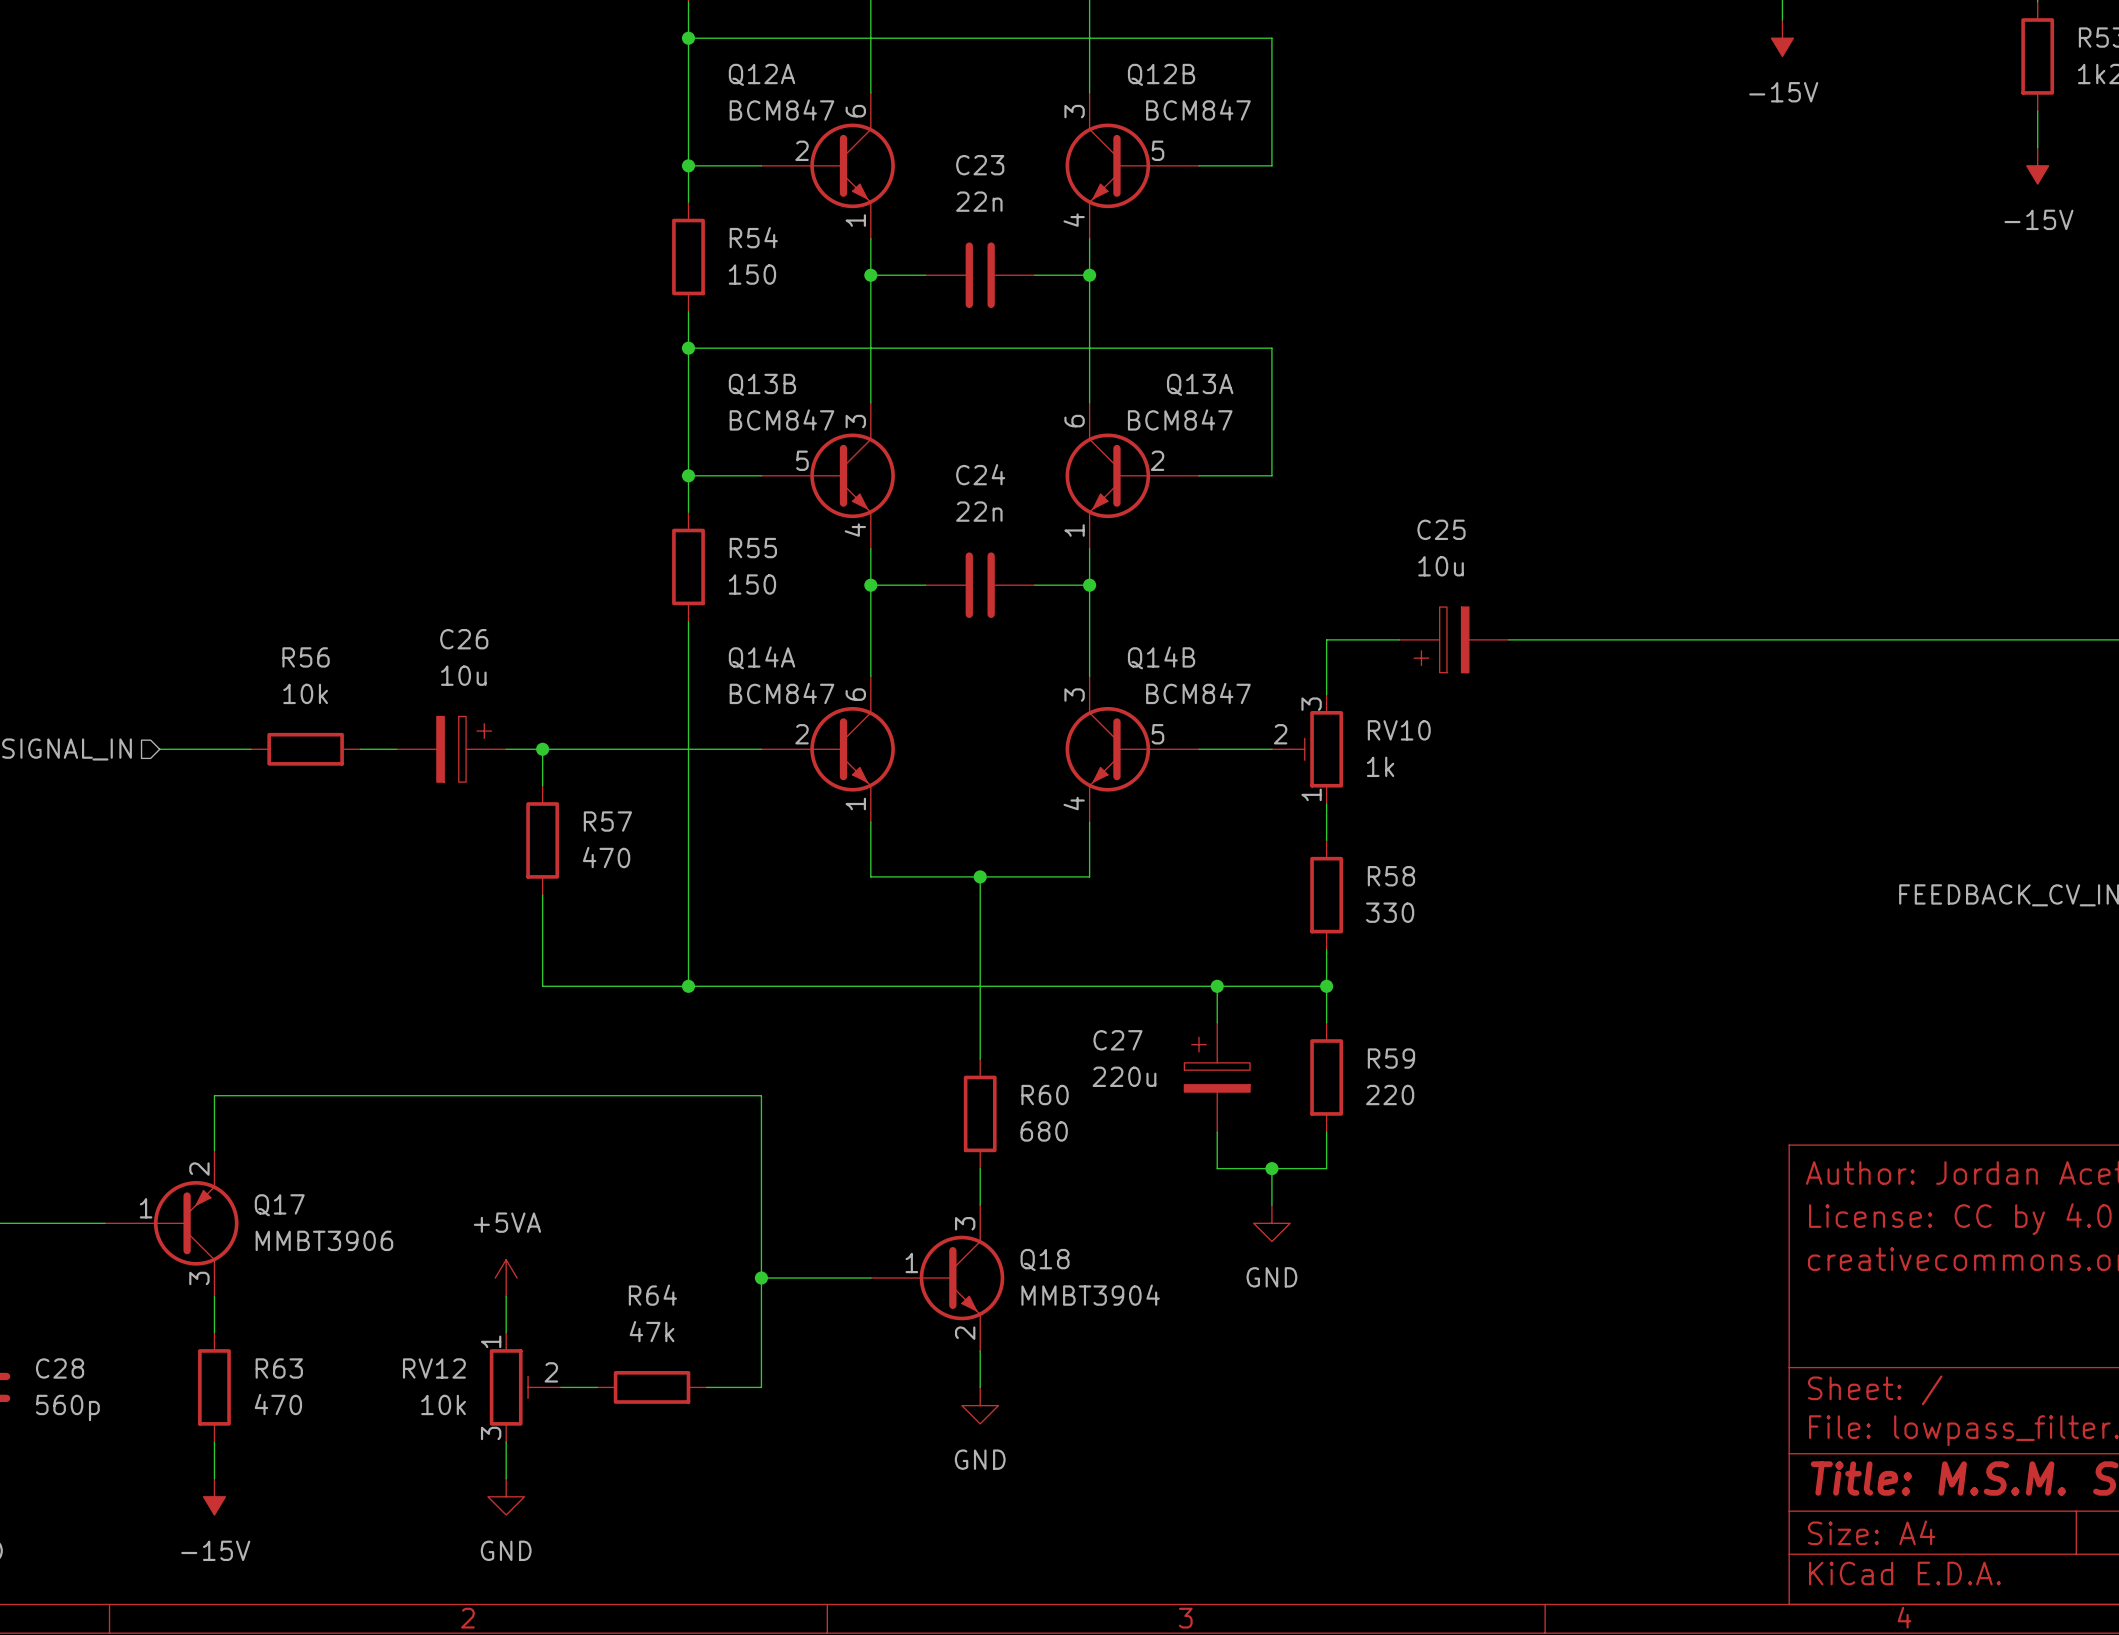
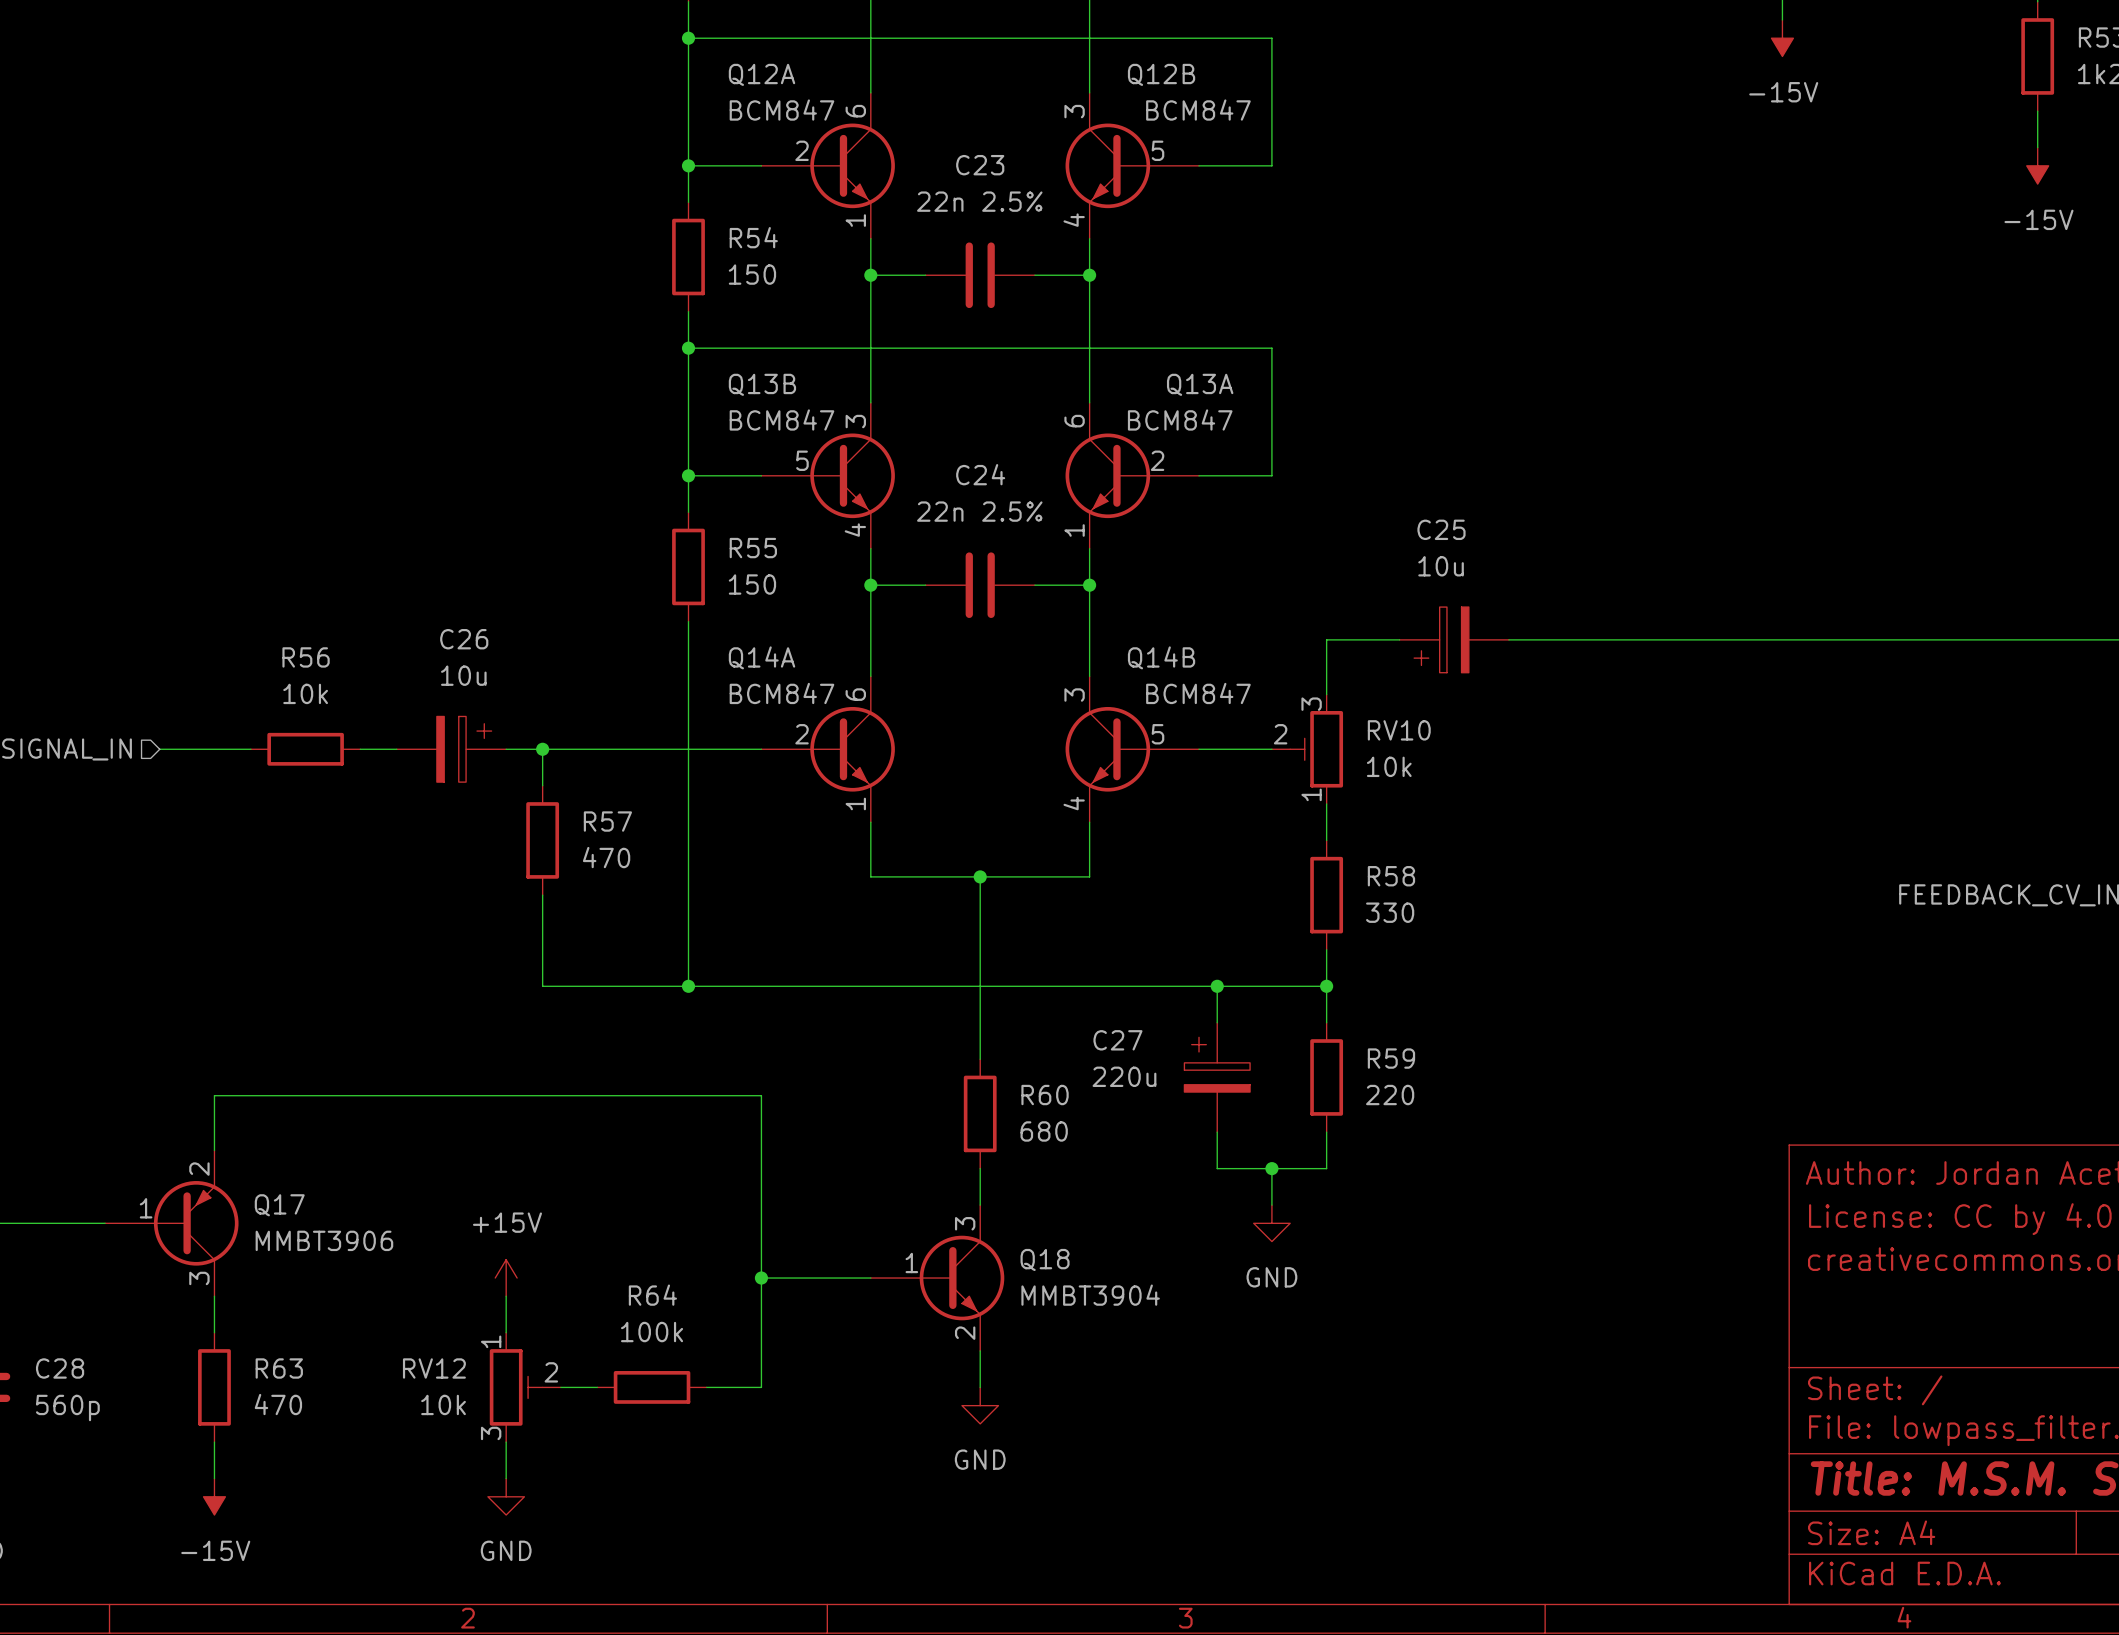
C23 value: 22n (979, 201) -> 22n 2.5% (979, 201)
C24 value: 22n (979, 511) -> 22n 2.5% (979, 511)
RV10 value: 1k (1380, 766) -> 10k (1389, 766)
power symbol: +5VA (506, 1278) -> +15V (506, 1278)
R64 value: 47k (652, 1331) -> 100k (652, 1332)

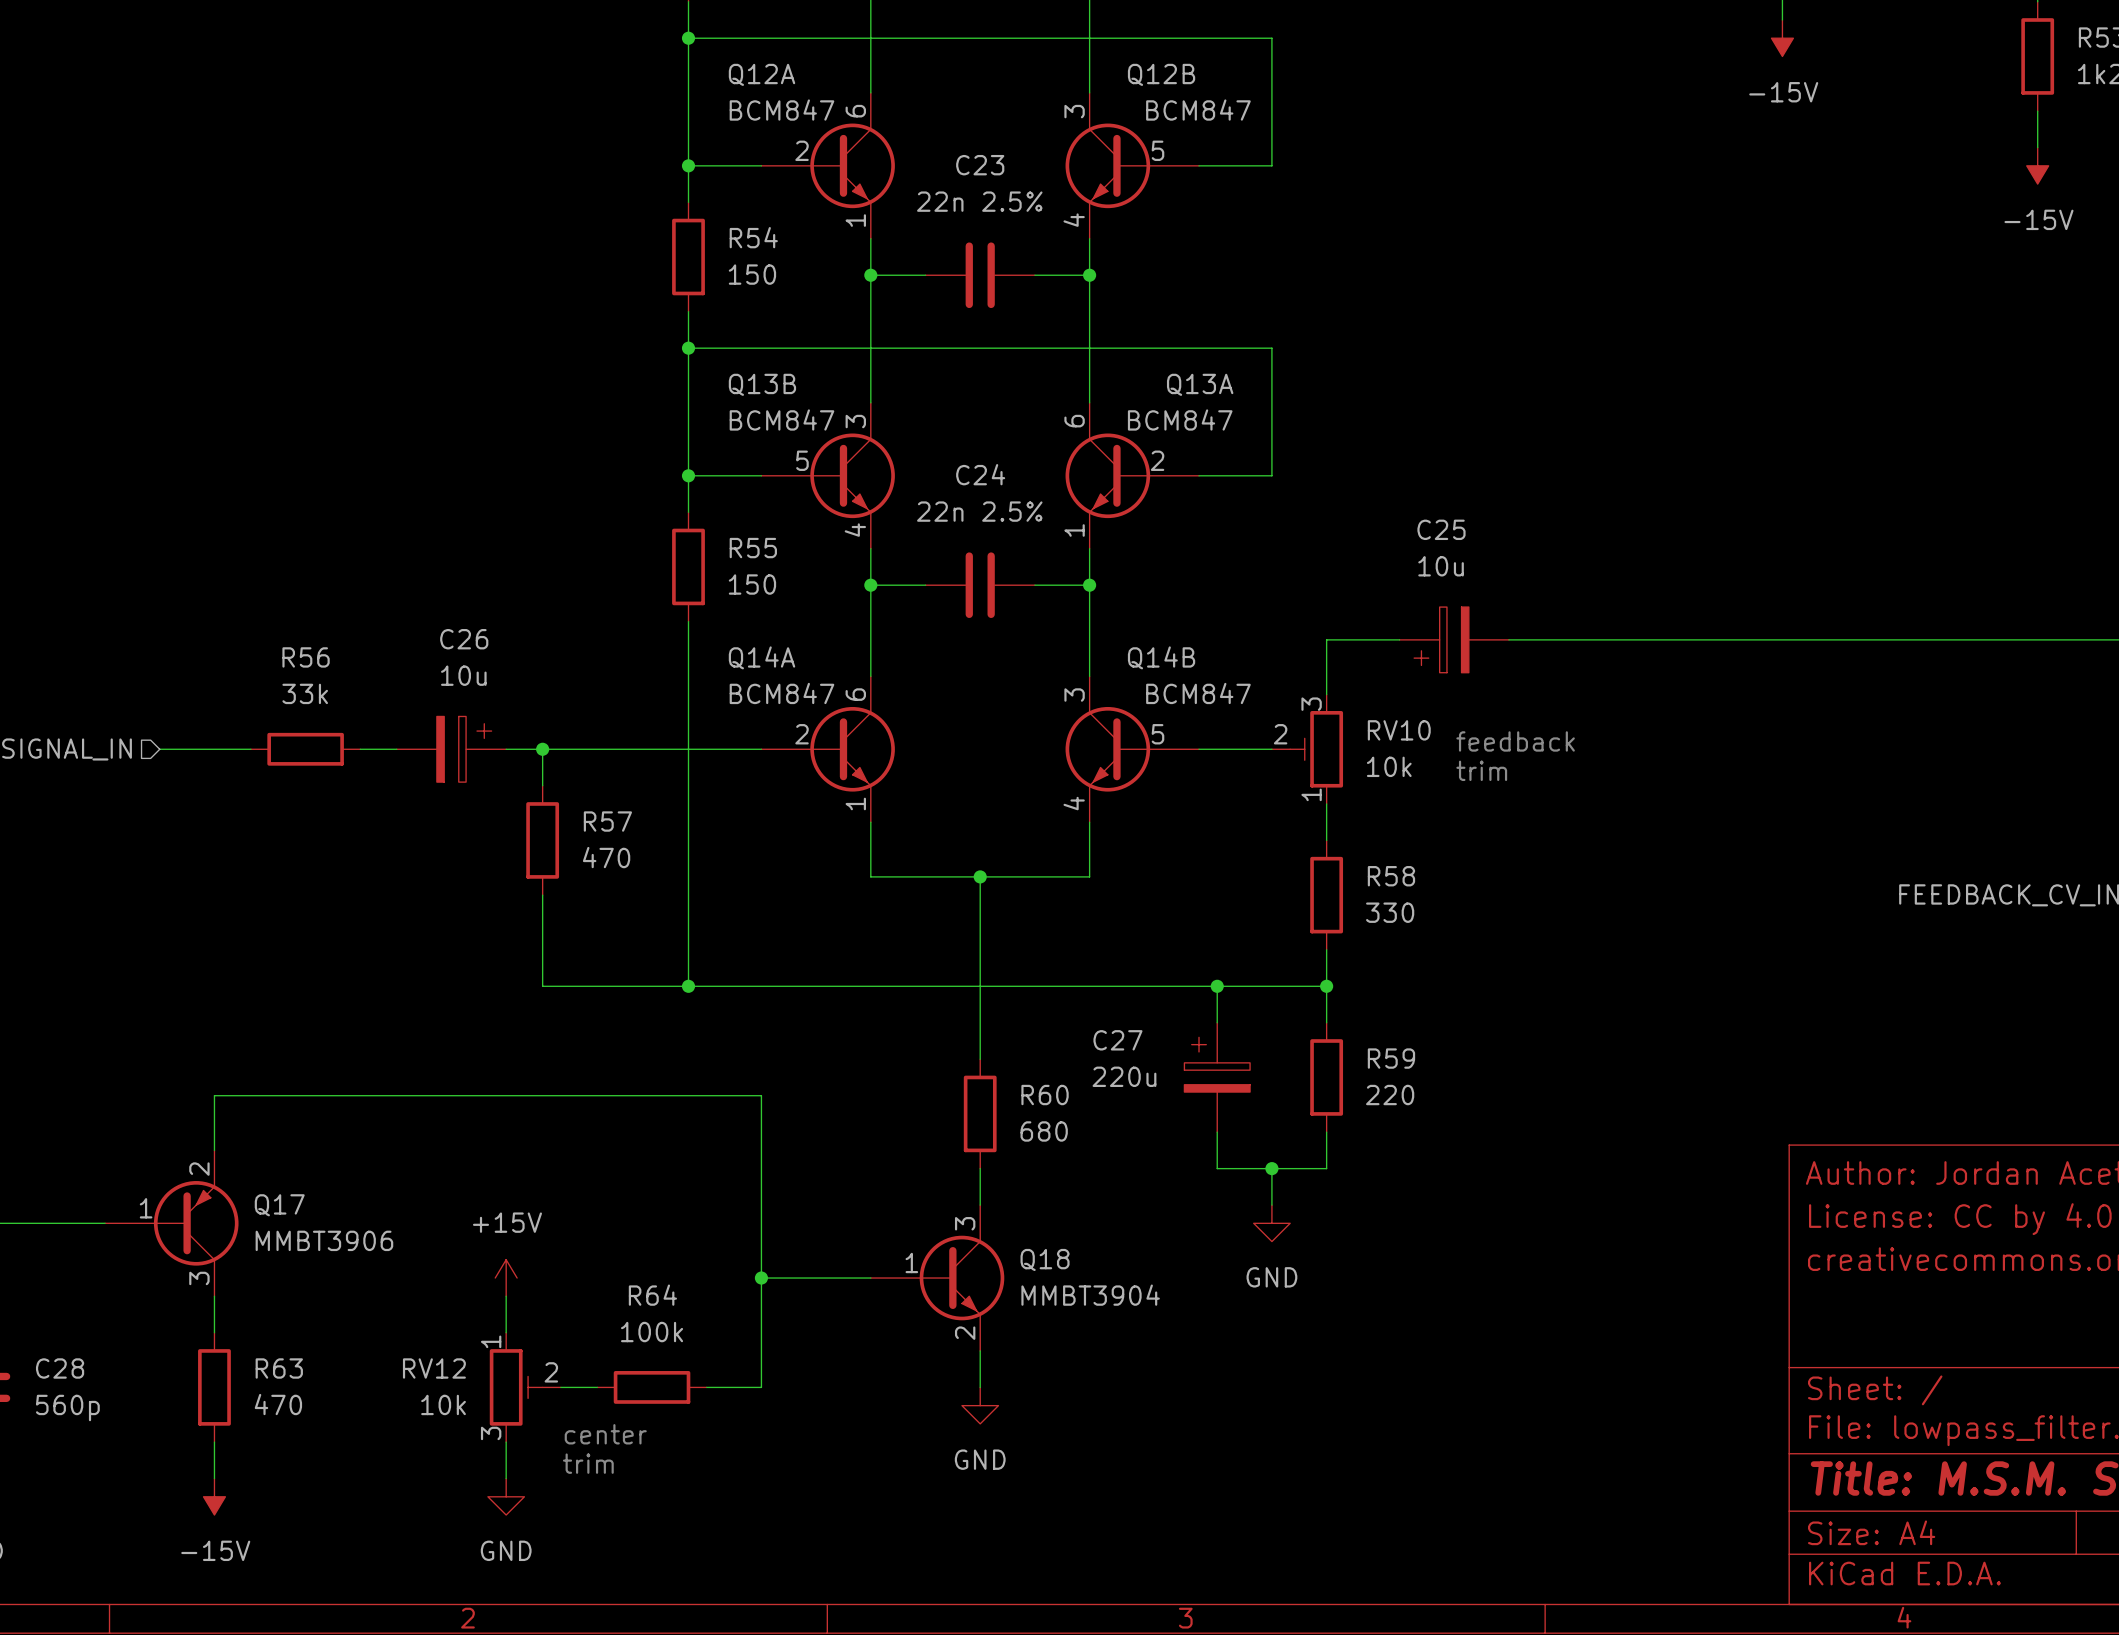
R56 value: 10k (305, 693) -> 33k (305, 693)
text: none -> feedback (1515, 741)
text: none -> trim (1481, 770)
text: none -> center (605, 1434)
text: none -> trim (588, 1463)

